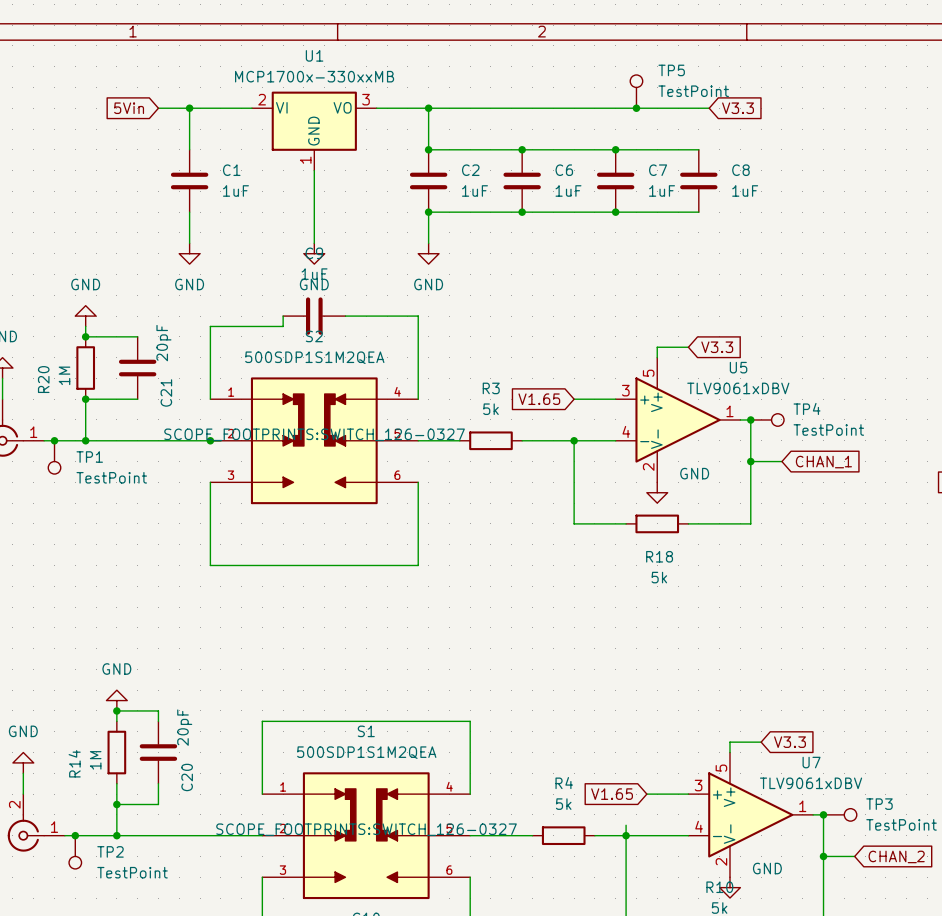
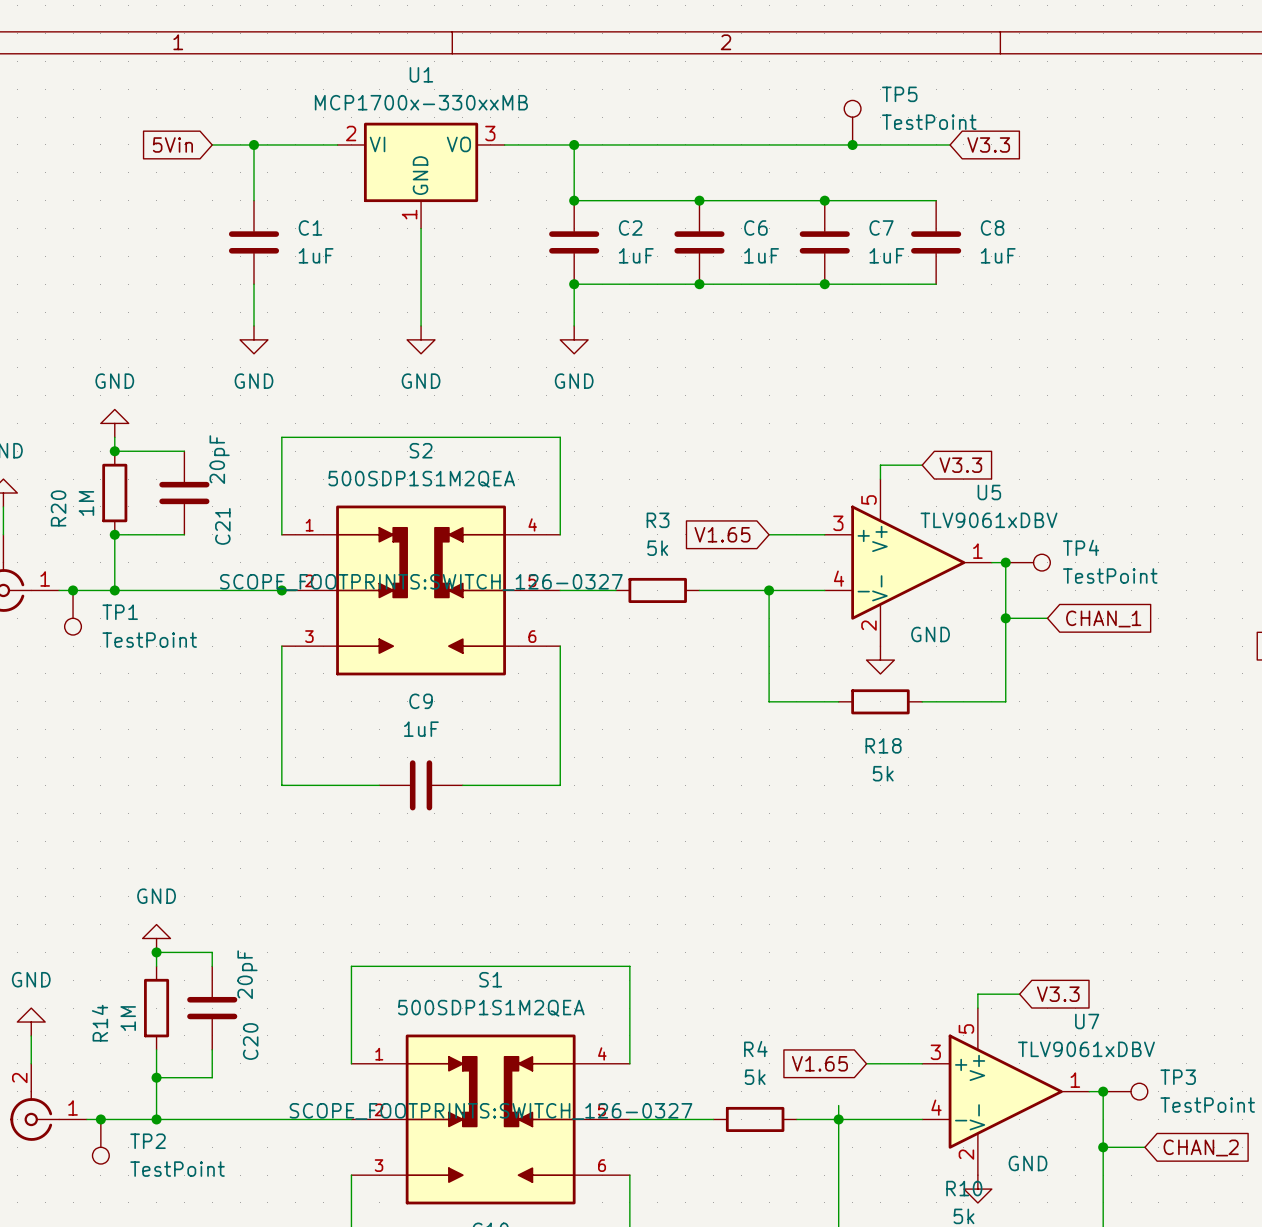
wire: (283, 316) (283, 326) -> none
C9 position: (314, 316) -> (421, 785)
wire: (345, 316) (418, 316) (418, 326) -> (379, 437) (560, 437)
wire: (210, 565) (418, 565) -> (281, 757) (281, 785) (379, 785)
wire: none -> (560, 757) (560, 785) (462, 785)

